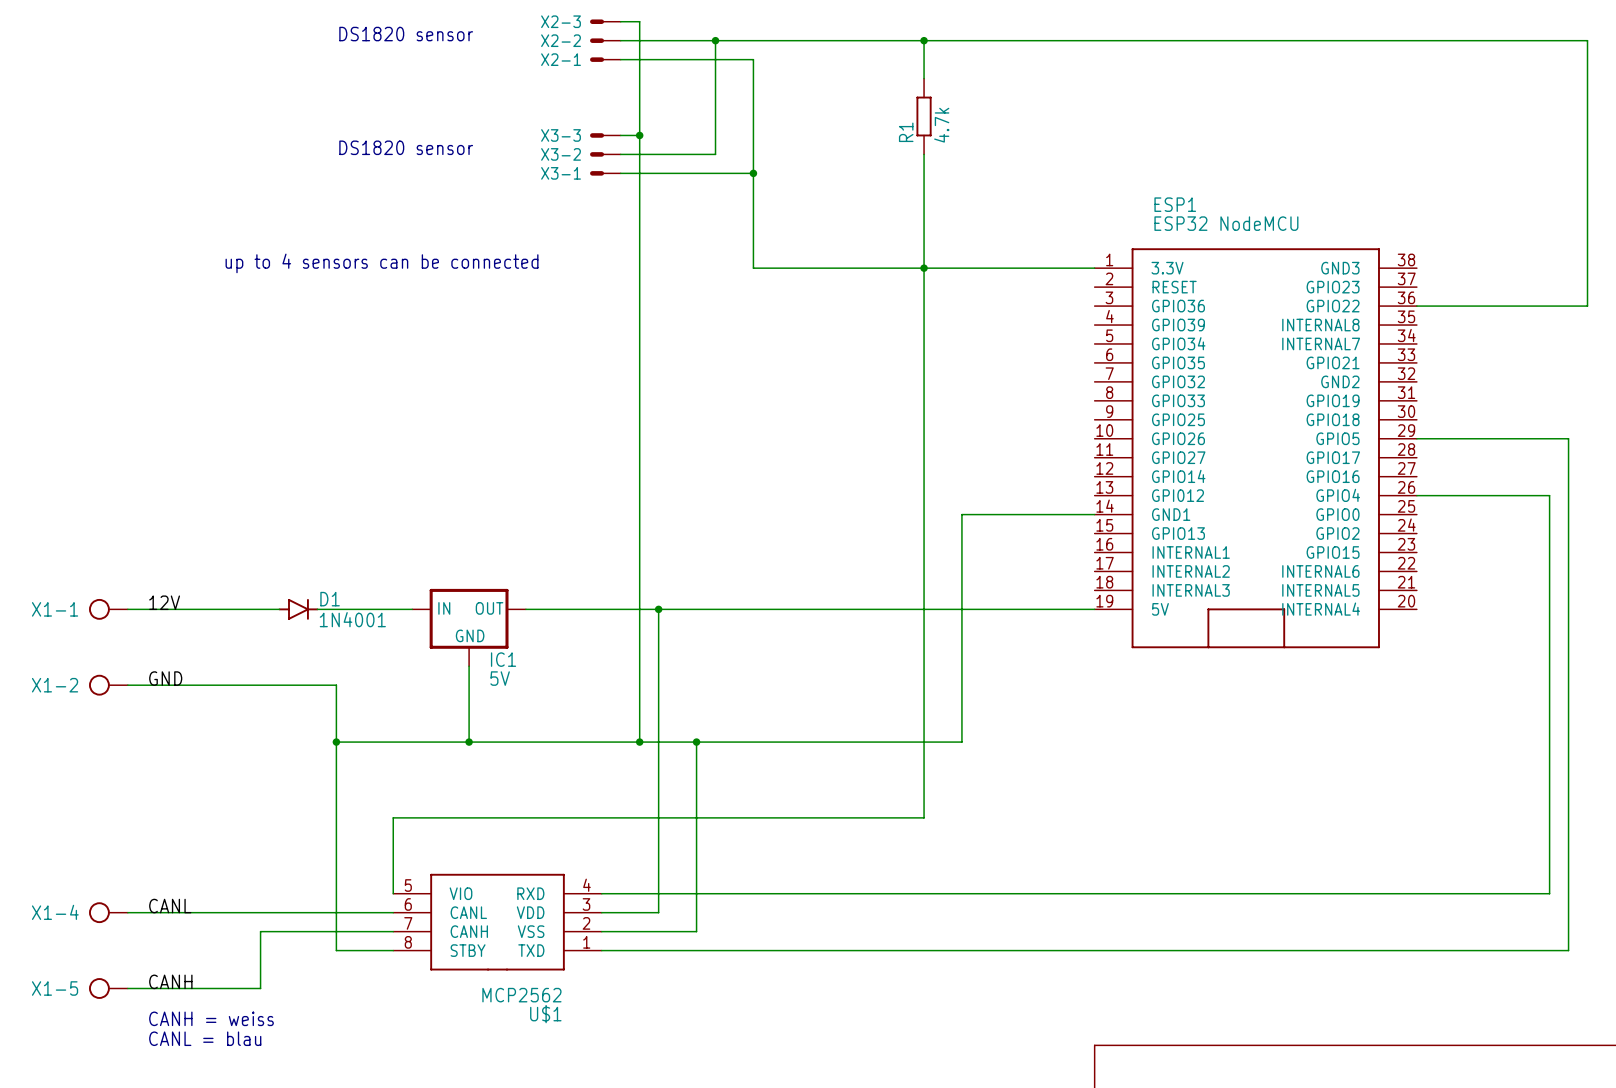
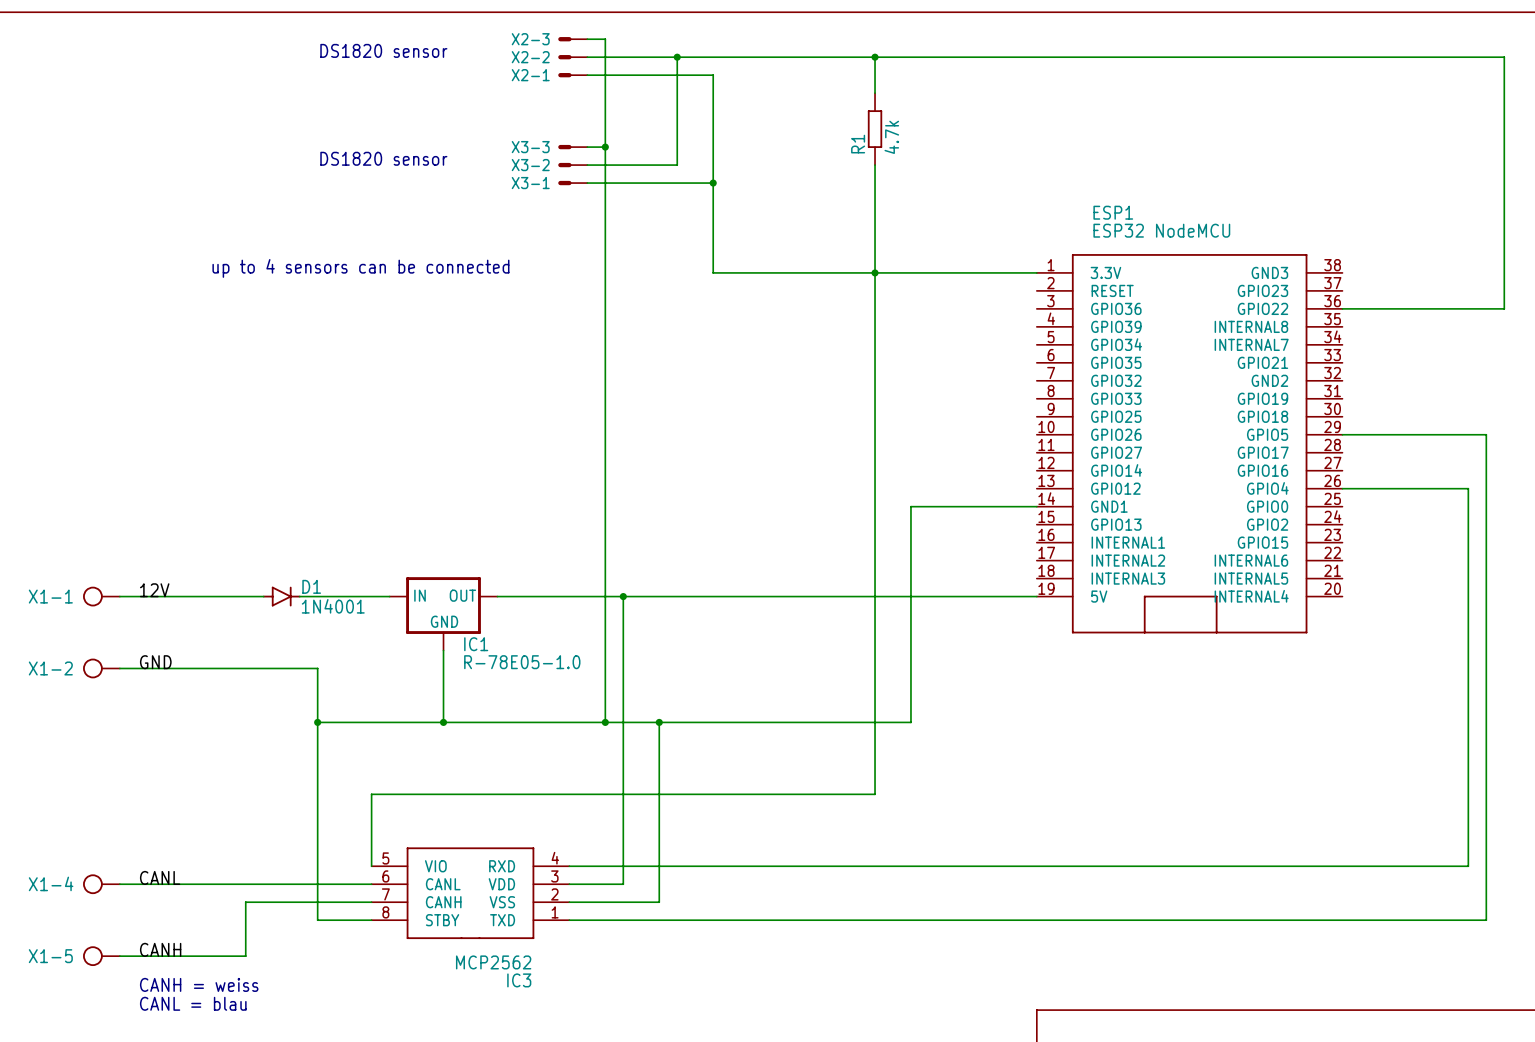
IC1 value: 5V (500, 678) -> R-78E05-1.0 (522, 662)
U$1 name: U$1 (545, 1014) -> IC3 (519, 980)

